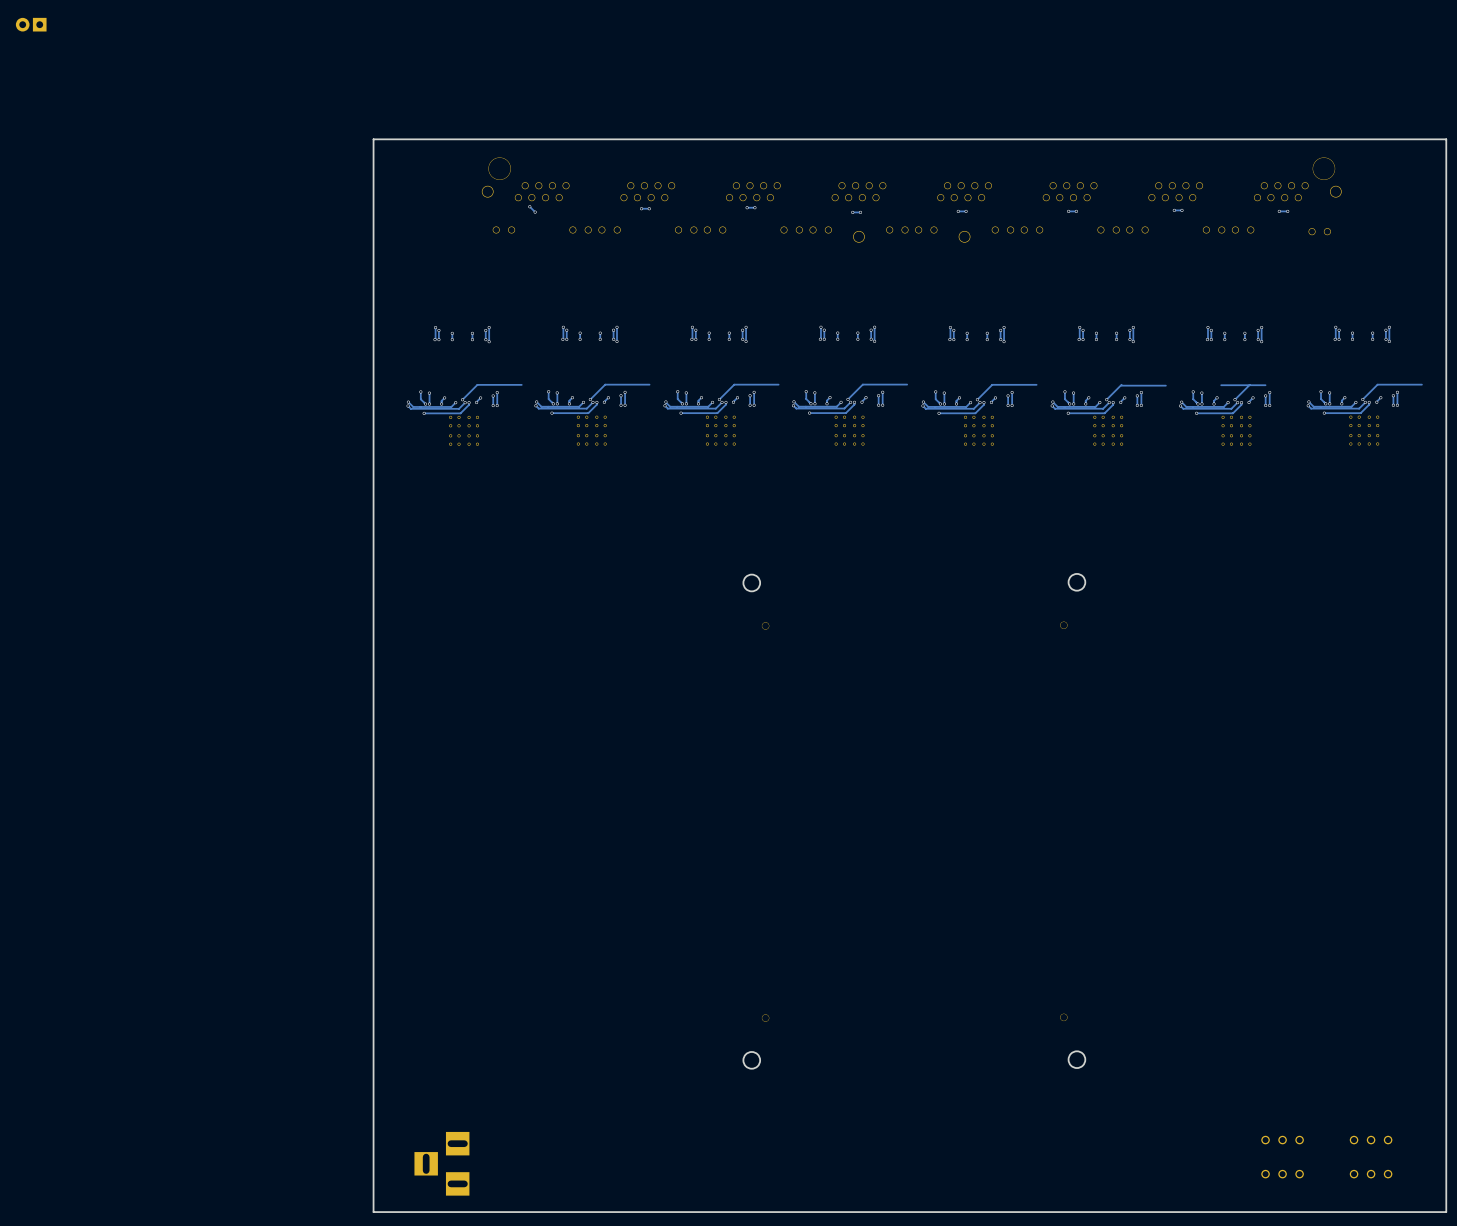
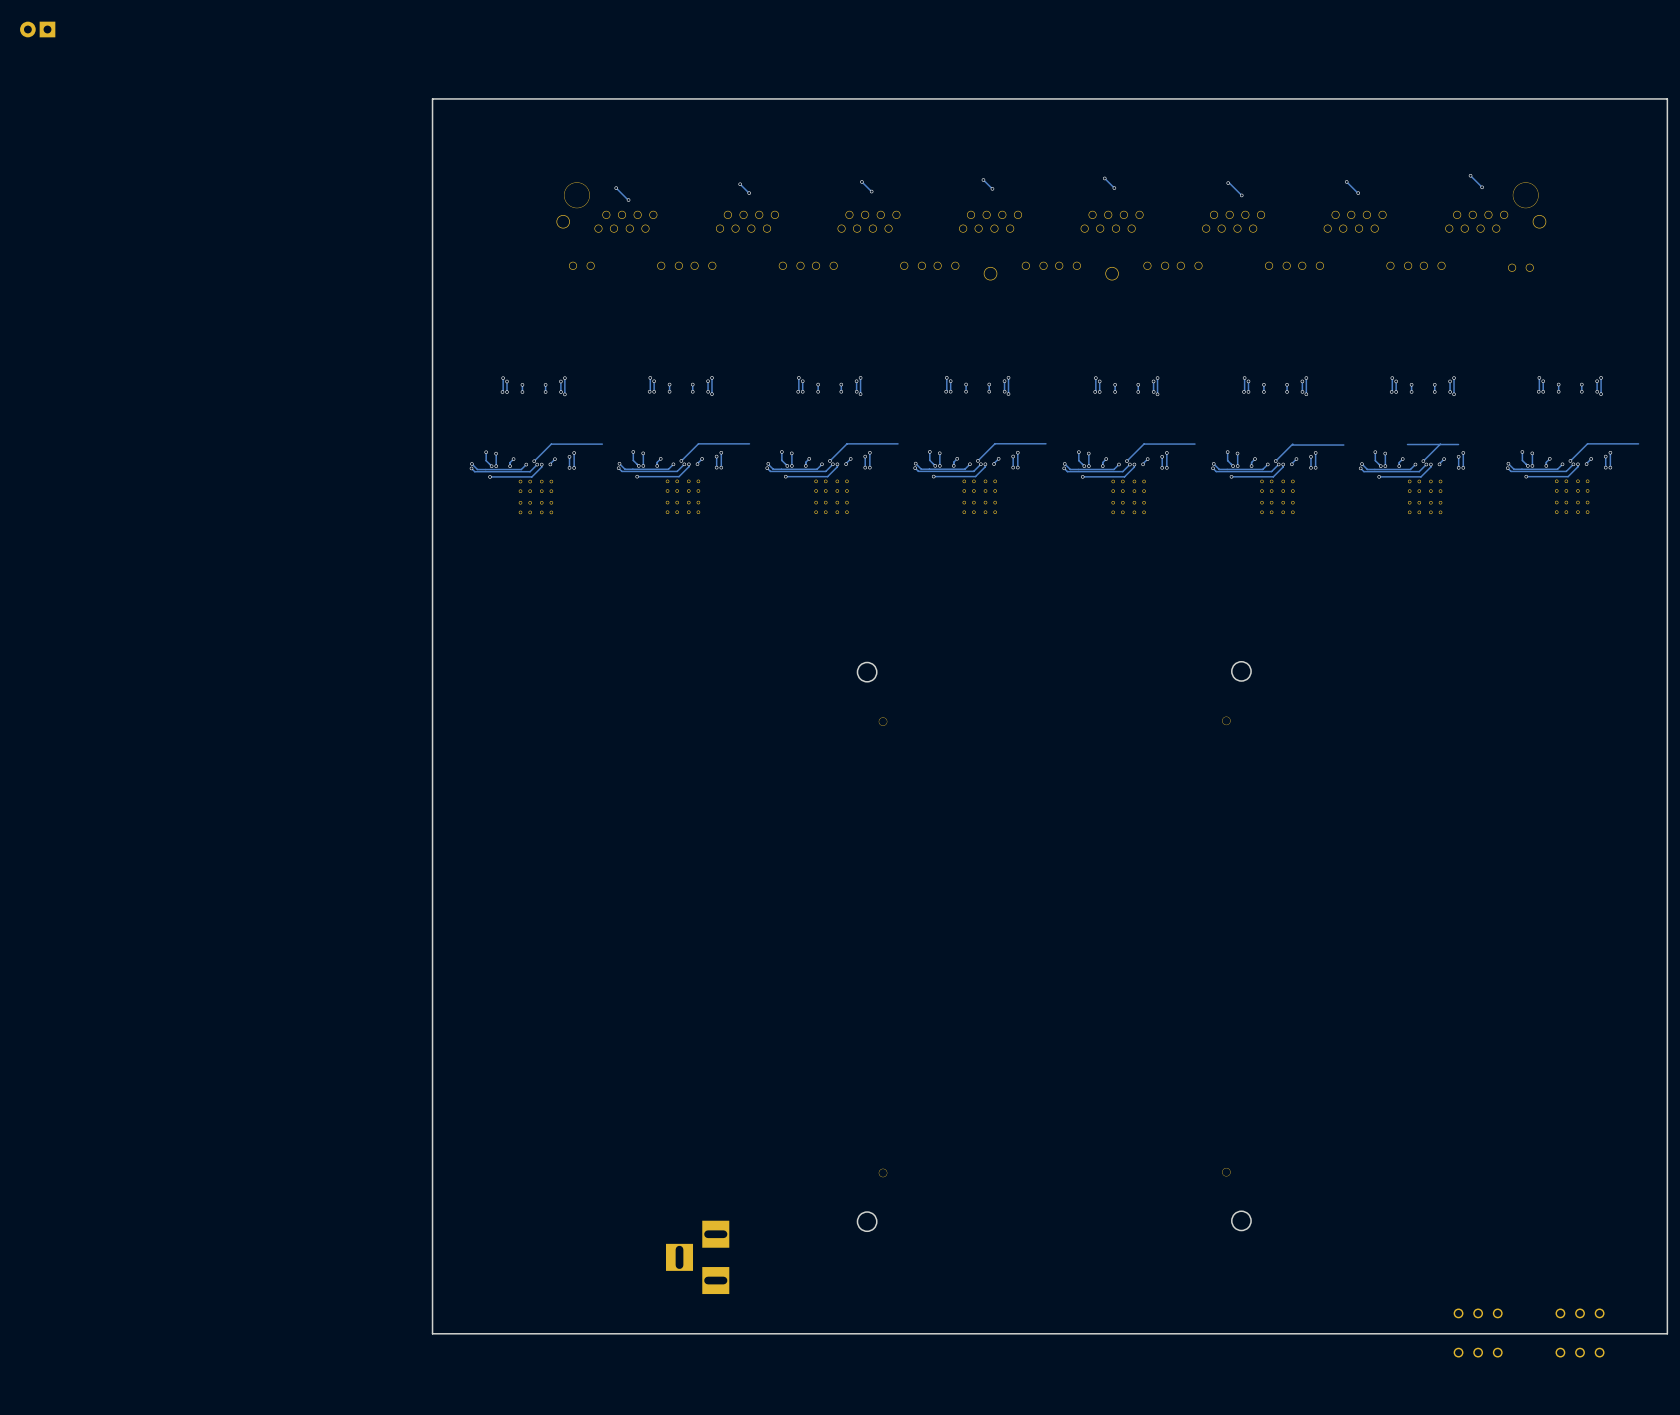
board edge: (1446, 139) (1446, 1212) (373, 1212) (373, 139) (1446, 139) -> (1667, 98) (1667, 1333) (432, 1333) (432, 98) (1667, 98)
track: none -> (1470, 175) (1482, 187)
via: none -> (1470, 175)
track: none -> (1104, 178) (1114, 188)
via: none -> (1104, 178)
track: none -> (983, 179) (992, 188)
via: none -> (983, 179)
track: none -> (861, 181) (871, 191)
via: none -> (861, 181)
track: none -> (1346, 181) (1358, 193)
via: none -> (1346, 181)
track: none -> (1228, 183) (1241, 195)
via: none -> (1228, 183)
track: none -> (740, 184) (749, 193)
via: none -> (740, 184)
via: none -> (1482, 187)
track: none -> (616, 188) (628, 200)
via: none -> (616, 188)
via: none -> (1114, 188)
via: none -> (992, 188)
via: none -> (871, 191)
via: none -> (749, 193)
via: none -> (1358, 193)
via: none -> (1241, 195)
via: none -> (628, 200)
track: (529, 206) (535, 212) -> none
via: (529, 206) -> none
via: (747, 207) -> none
track: (754, 207) (747, 207) -> none
via: (754, 207) -> none
via: (641, 208) -> none
track: (649, 208) (641, 208) -> none
via: (649, 208) -> none
via: (1174, 210) -> none
track: (1182, 210) (1174, 210) -> none
via: (1182, 210) -> none
via: (958, 211) -> none
track: (966, 211) (958, 211) -> none
via: (966, 211) -> none
via: (1068, 211) -> none
track: (1076, 211) (1068, 211) -> none
via: (1076, 211) -> none
via: (1279, 211) -> none
via: (1287, 211) -> none
track: (1288, 211) (1279, 211) -> none
via: (535, 212) -> none
via: (852, 212) -> none
track: (860, 212) (852, 212) -> none
via: (860, 212) -> none
part: none -> (697, 1257)
part: (441, 1163) -> none

